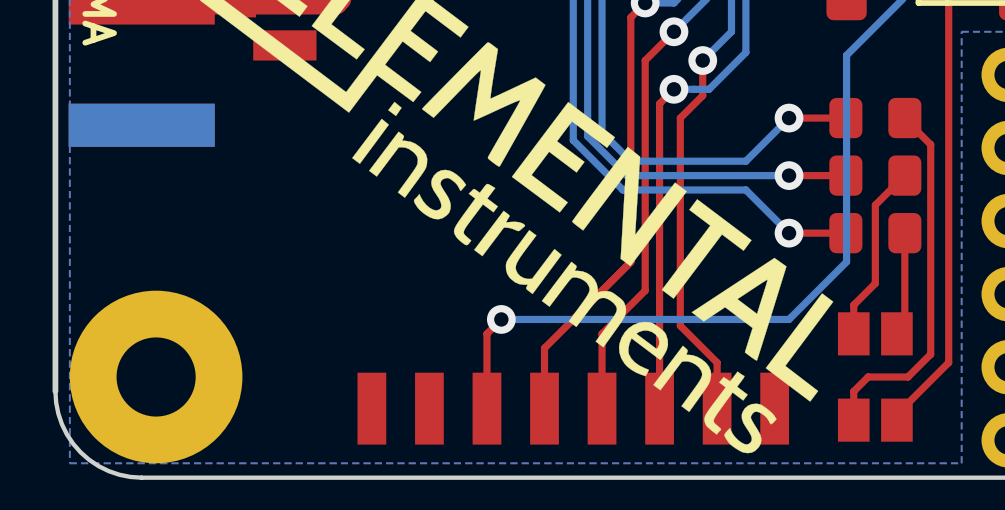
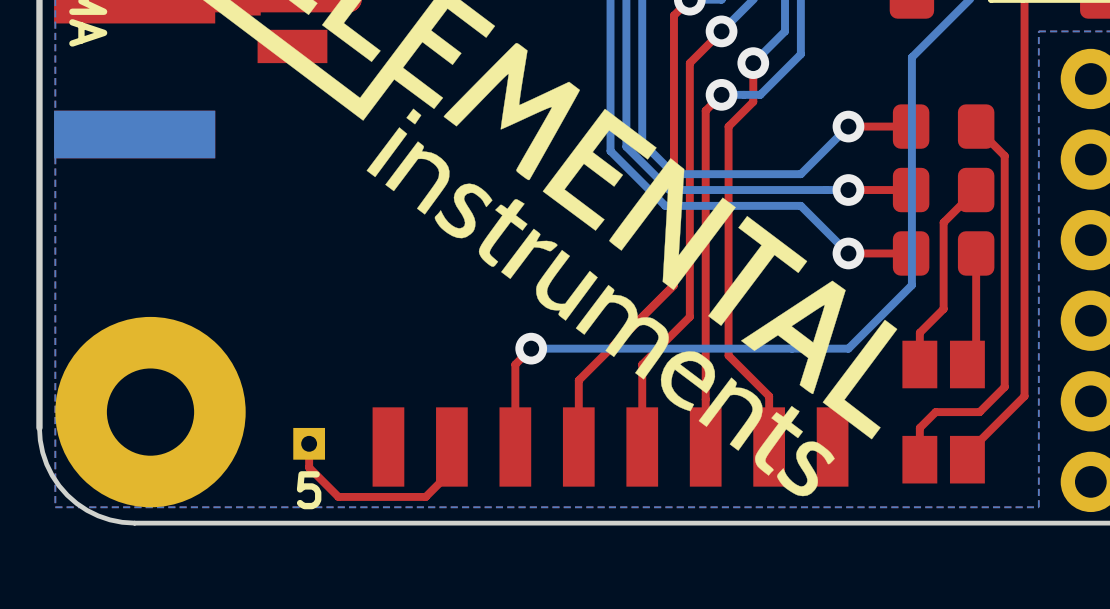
top track: none -> (309, 443) (309, 467) (338, 496) (425, 496) (451, 470) (451, 446)
part: none -> (309, 443)
text: none -> 5 (309, 490)

